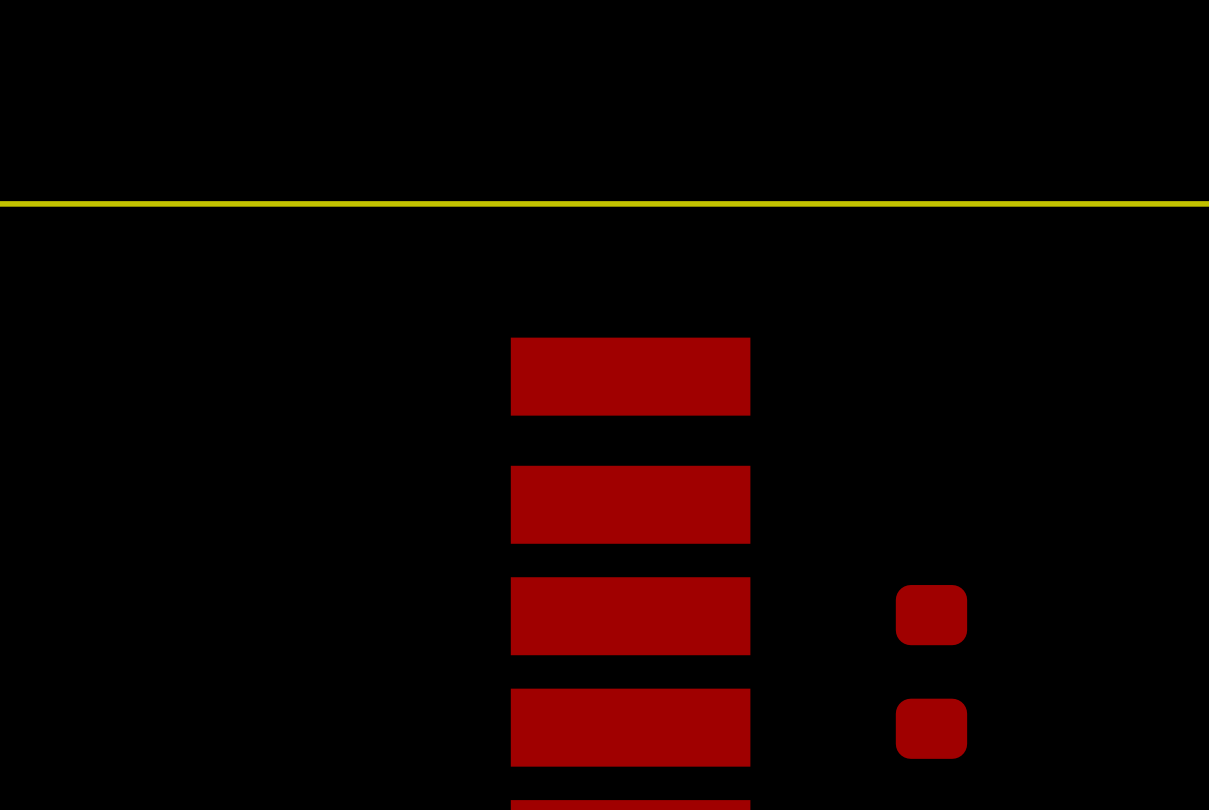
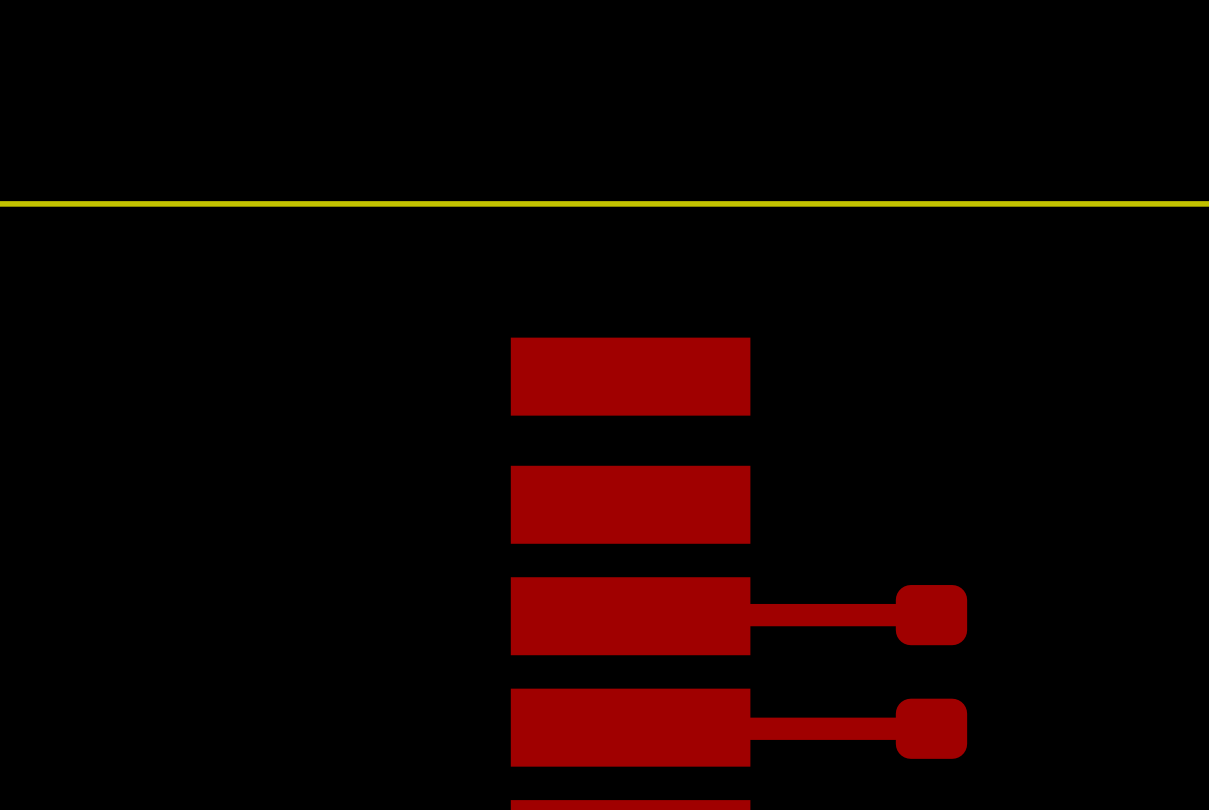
top track: none -> (931, 615) (642, 615)
top track: none -> (931, 728) (642, 728)

